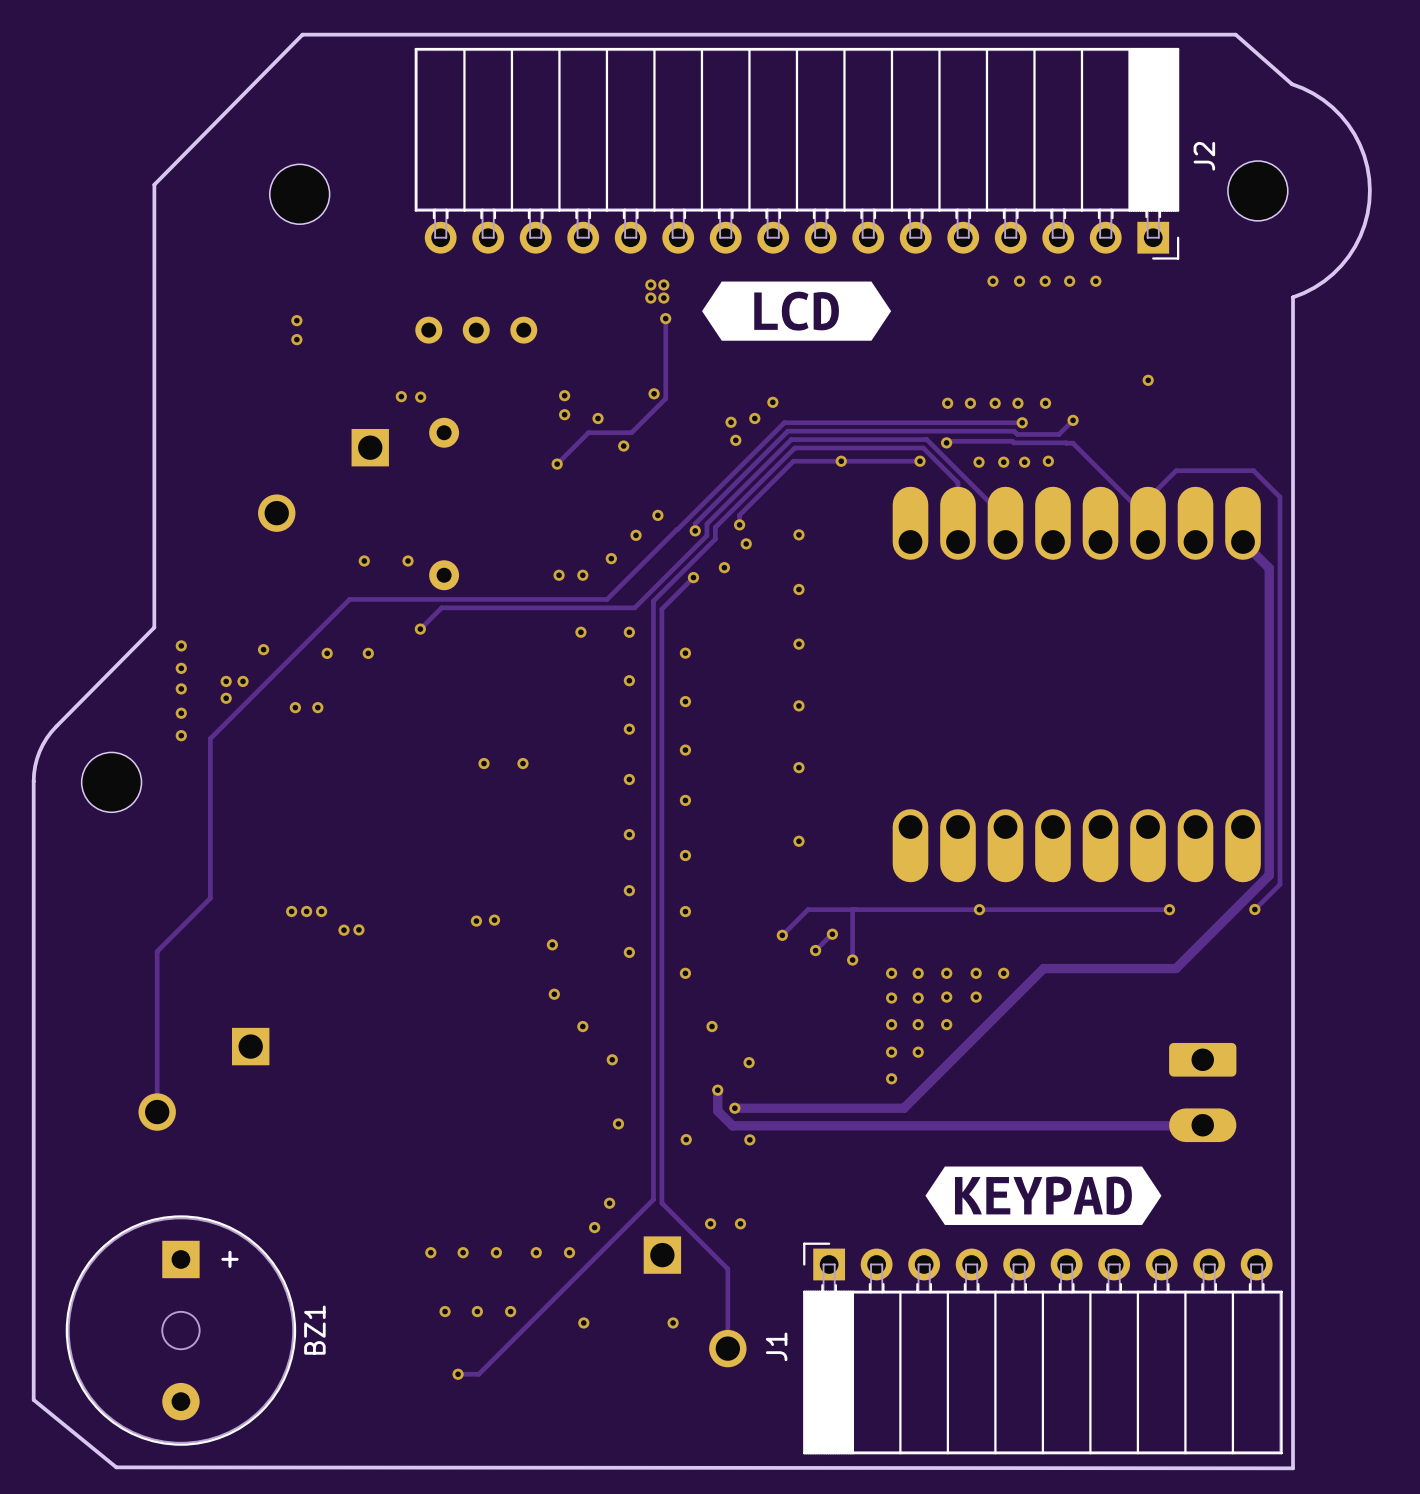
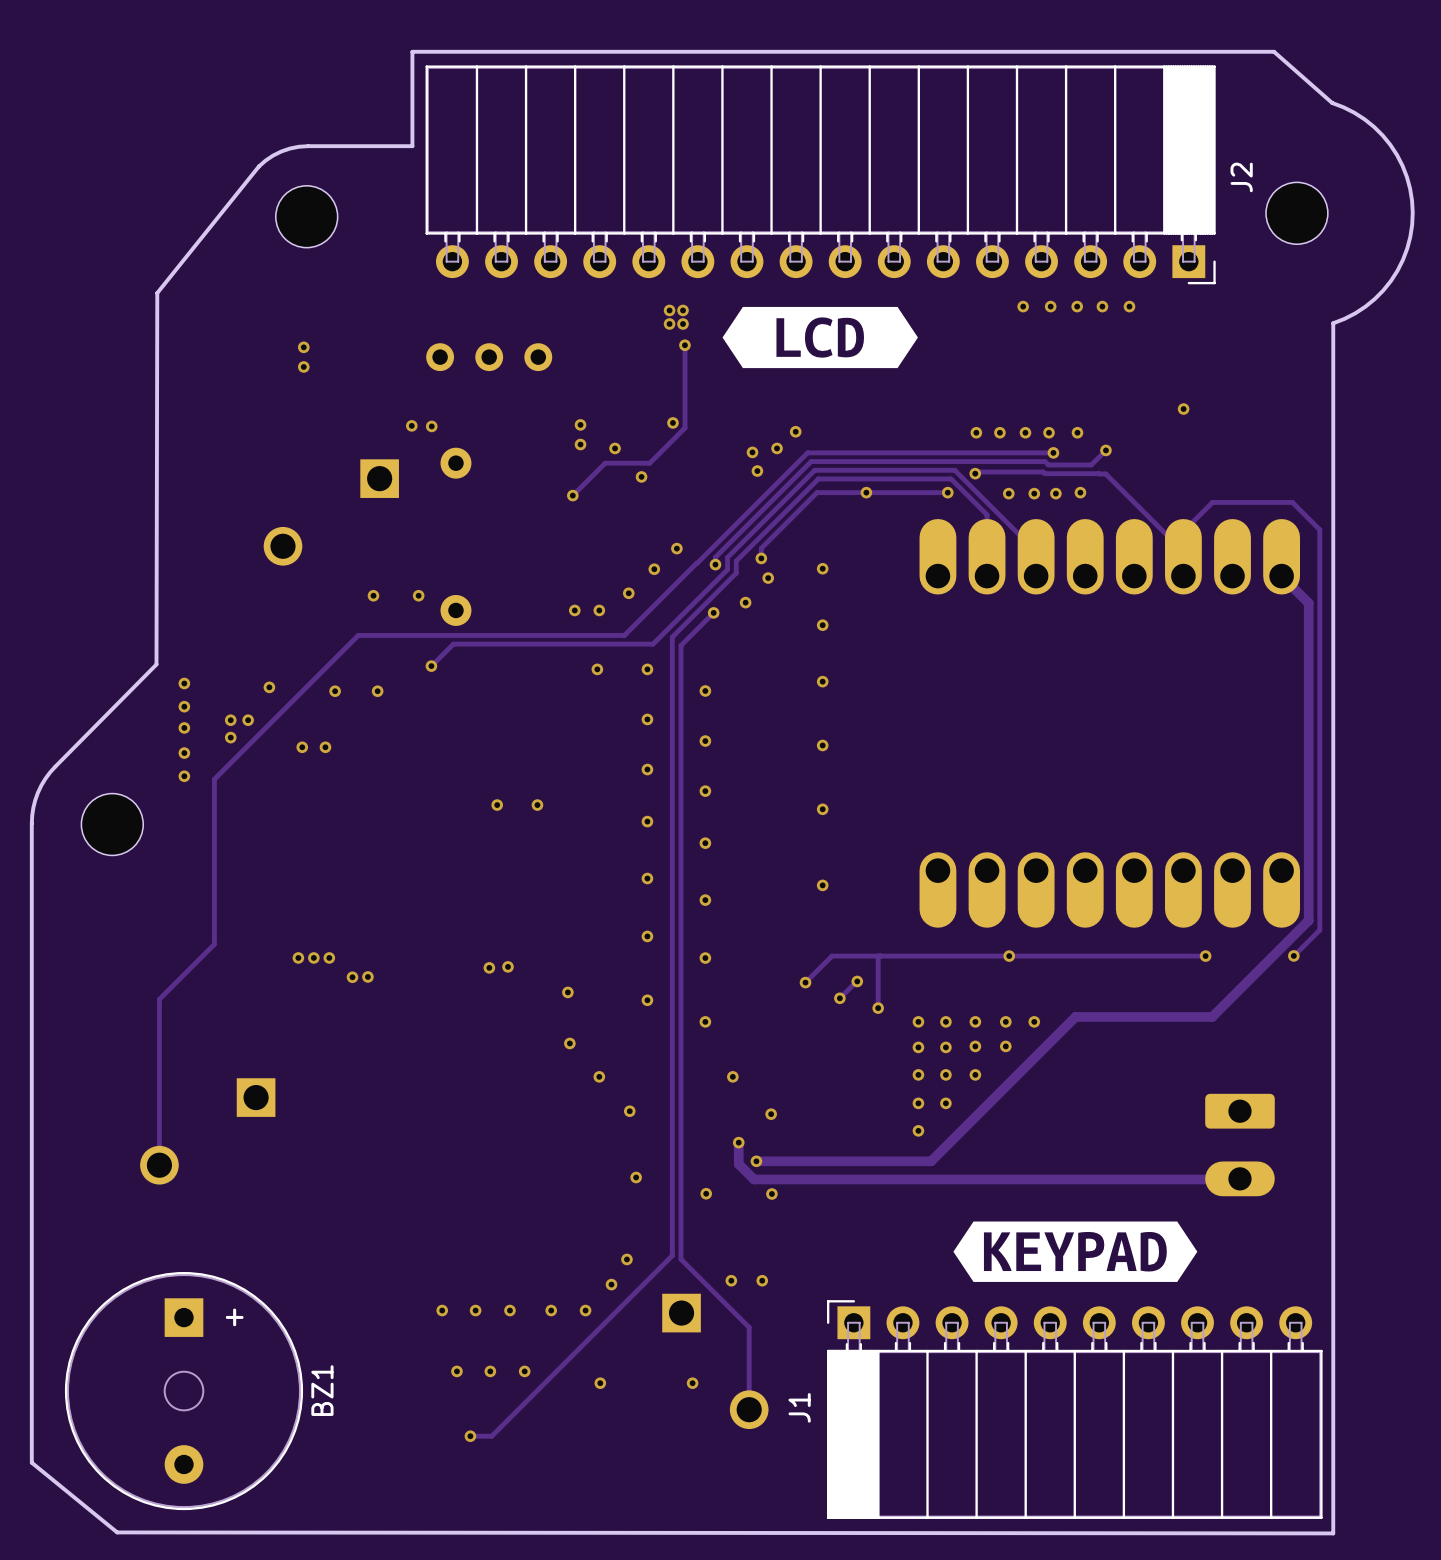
board edge: (401, 34) (302, 34) (154, 184) (154, 627) -> (412, 51) (412, 146) (298, 146) (273, 155) (258, 166) (157, 293) (156, 664)

